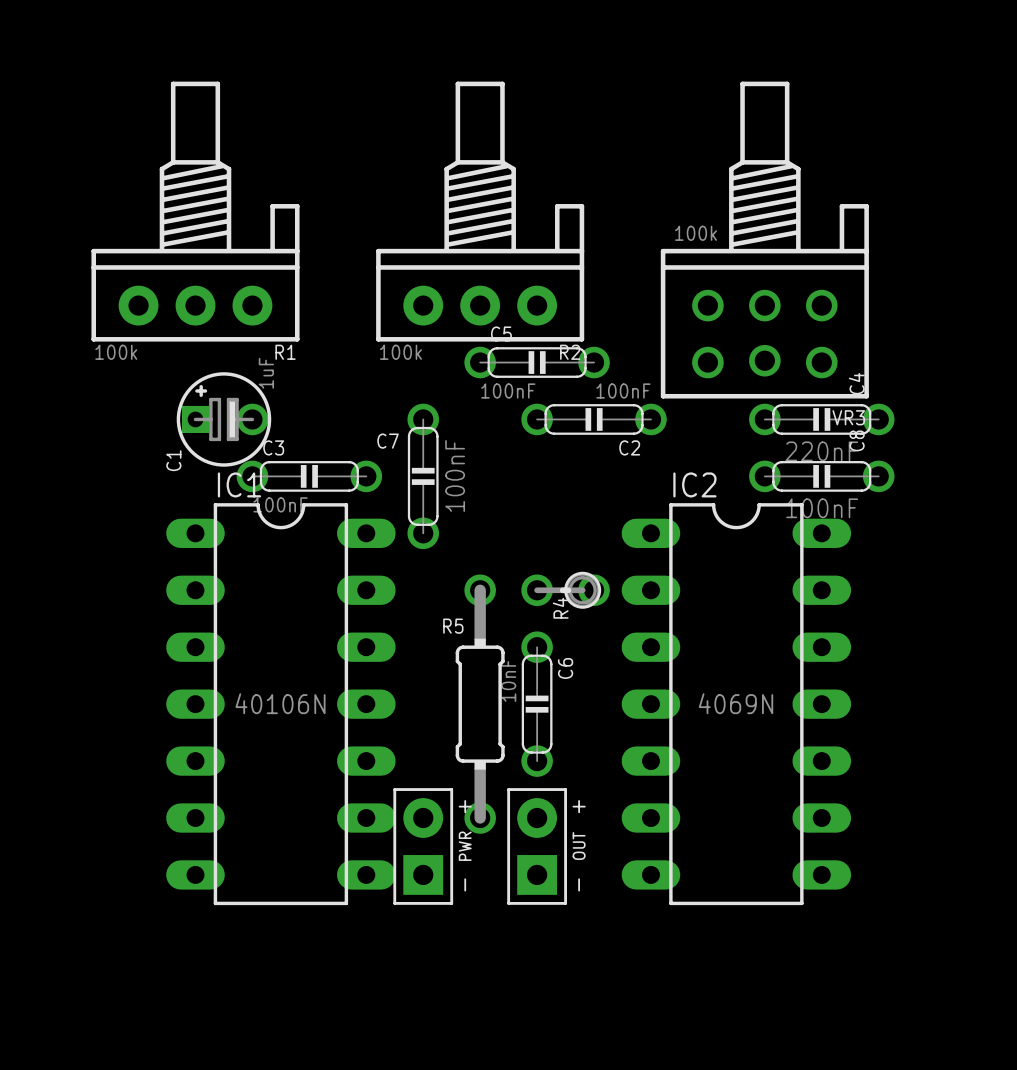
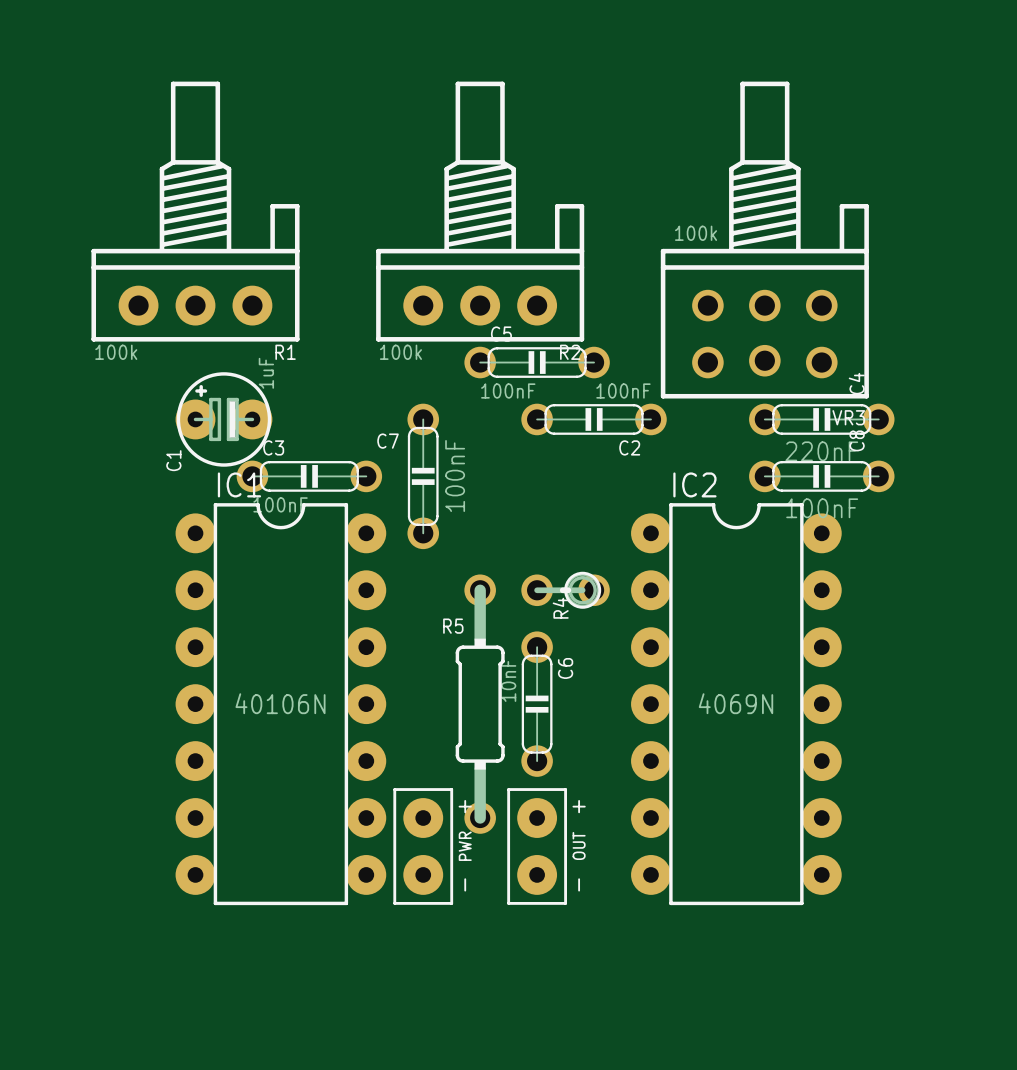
C1 footprint: [176, 372, 272, 467] -> [175, 372, 273, 467]
IC1 footprint: [166, 503, 396, 906] -> [175, 503, 387, 906]
IC2 footprint: [621, 503, 852, 906] -> [631, 503, 842, 906]
PWR footprint: [393, 788, 472, 905] -> [393, 788, 472, 905]
OUT footprint: [507, 788, 586, 905] -> [507, 788, 586, 905]

